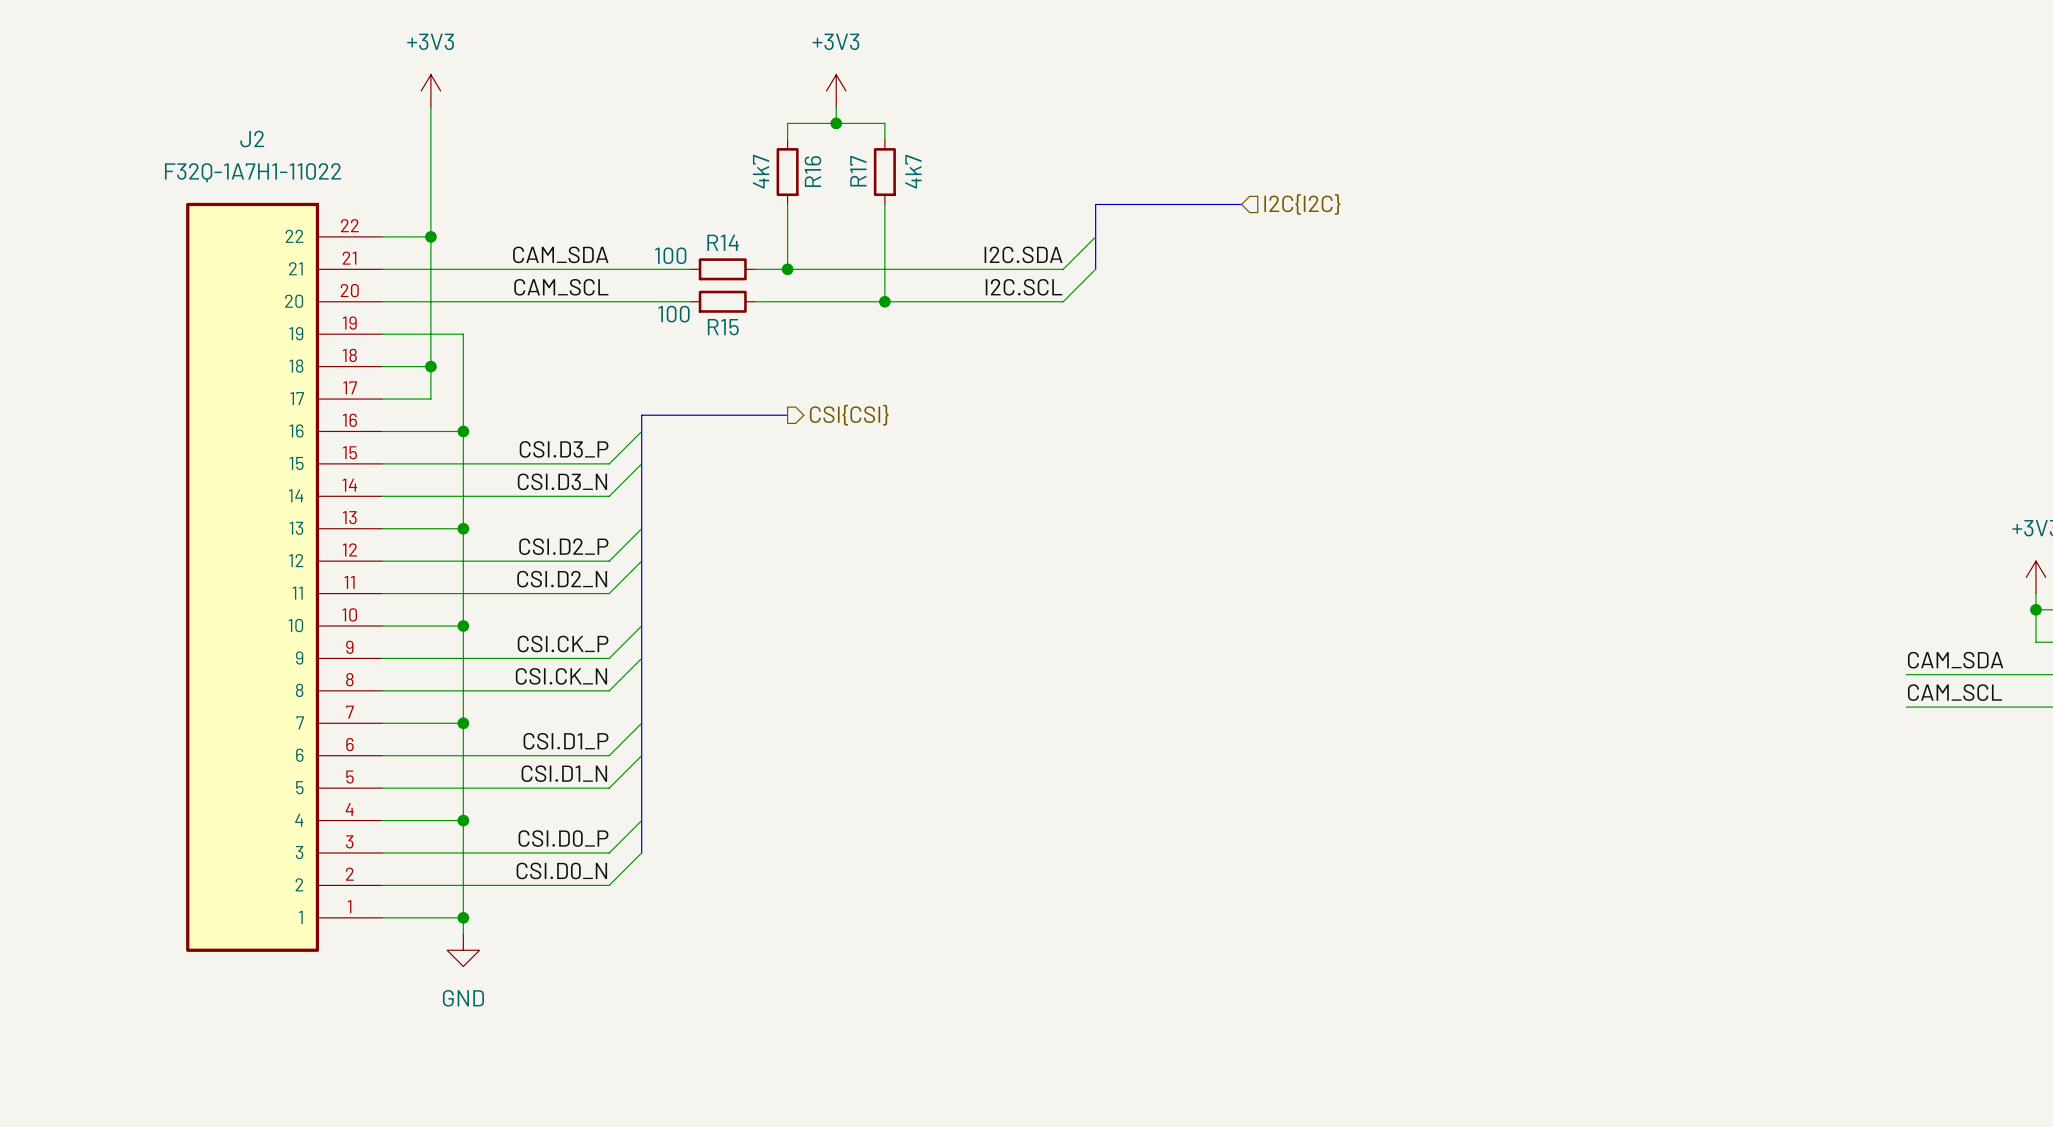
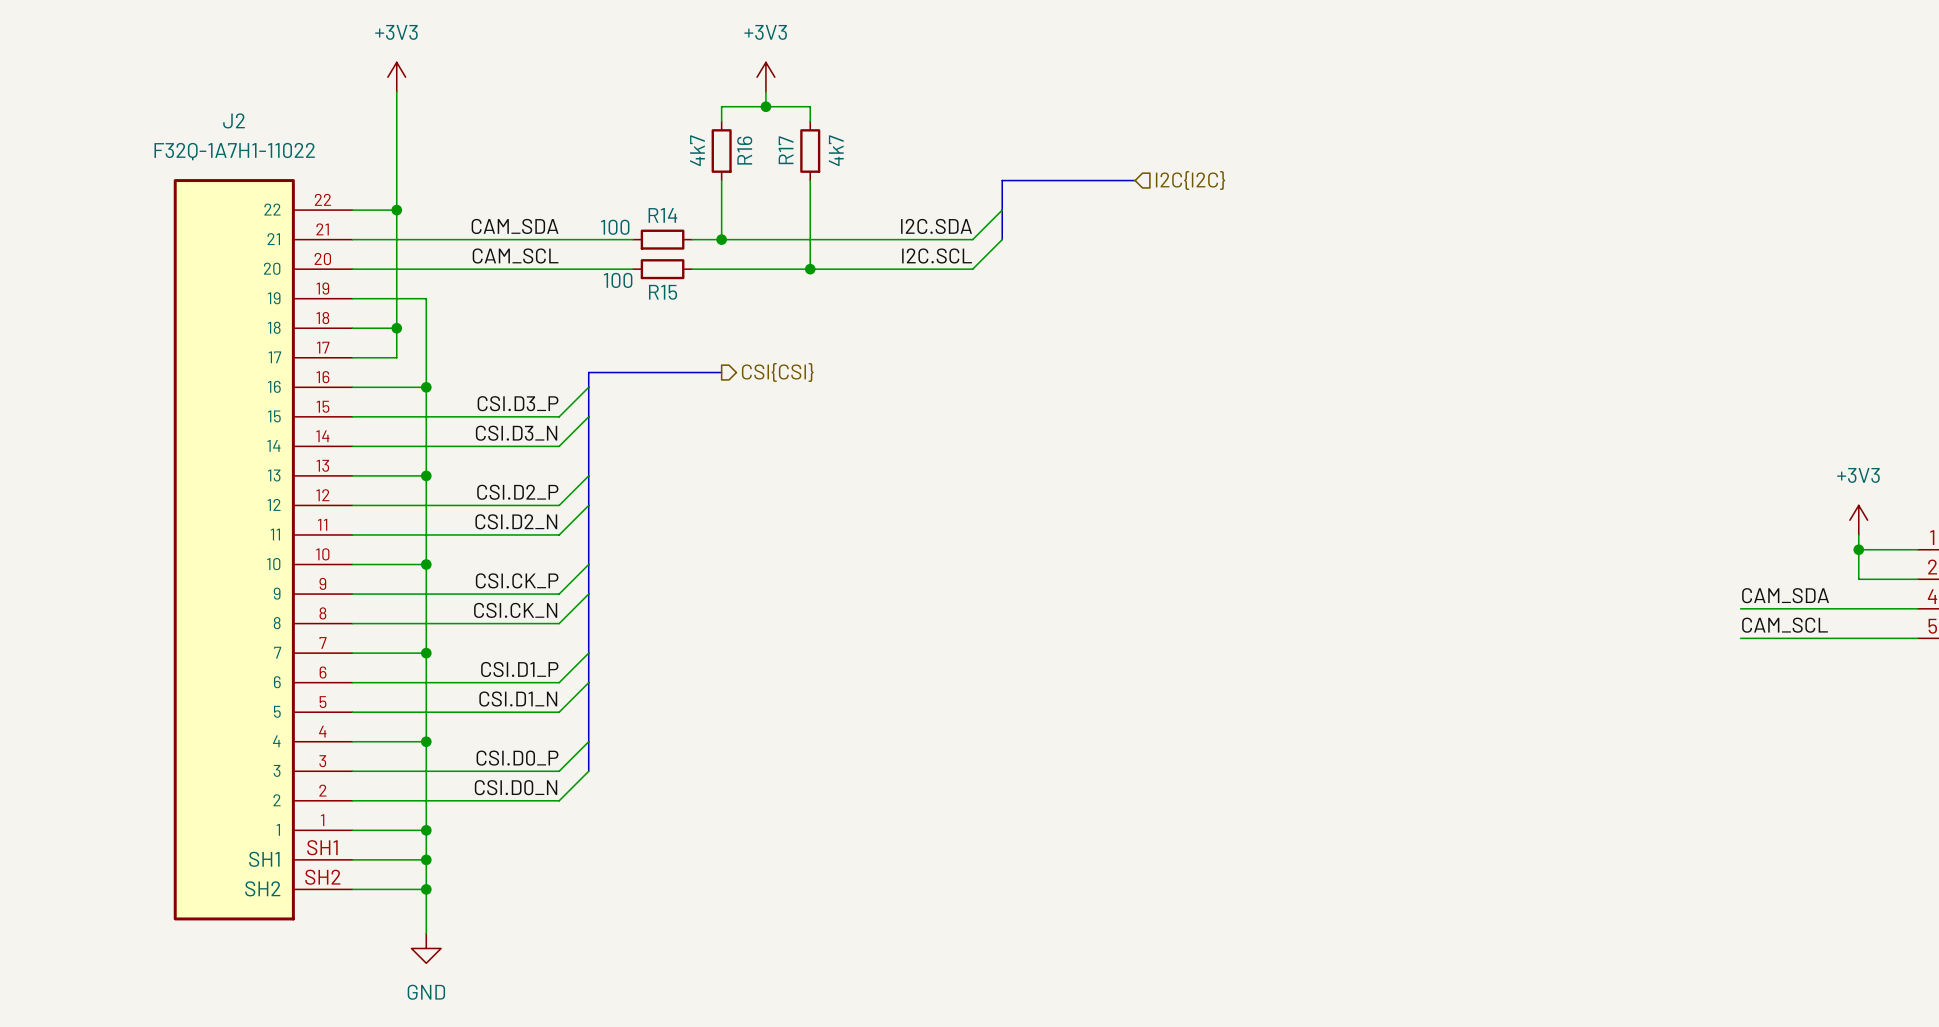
J2 symbol: [186, 202, 383, 952] -> [173, 179, 353, 921]
wire: none -> (426, 845) (426, 933)
wire: none -> (352, 859) (426, 859)
power symbol position: GND (463, 950) -> GND (426, 948)
junction: none -> (426, 859)
wire: none -> (352, 889) (426, 889)
junction: none -> (426, 889)

